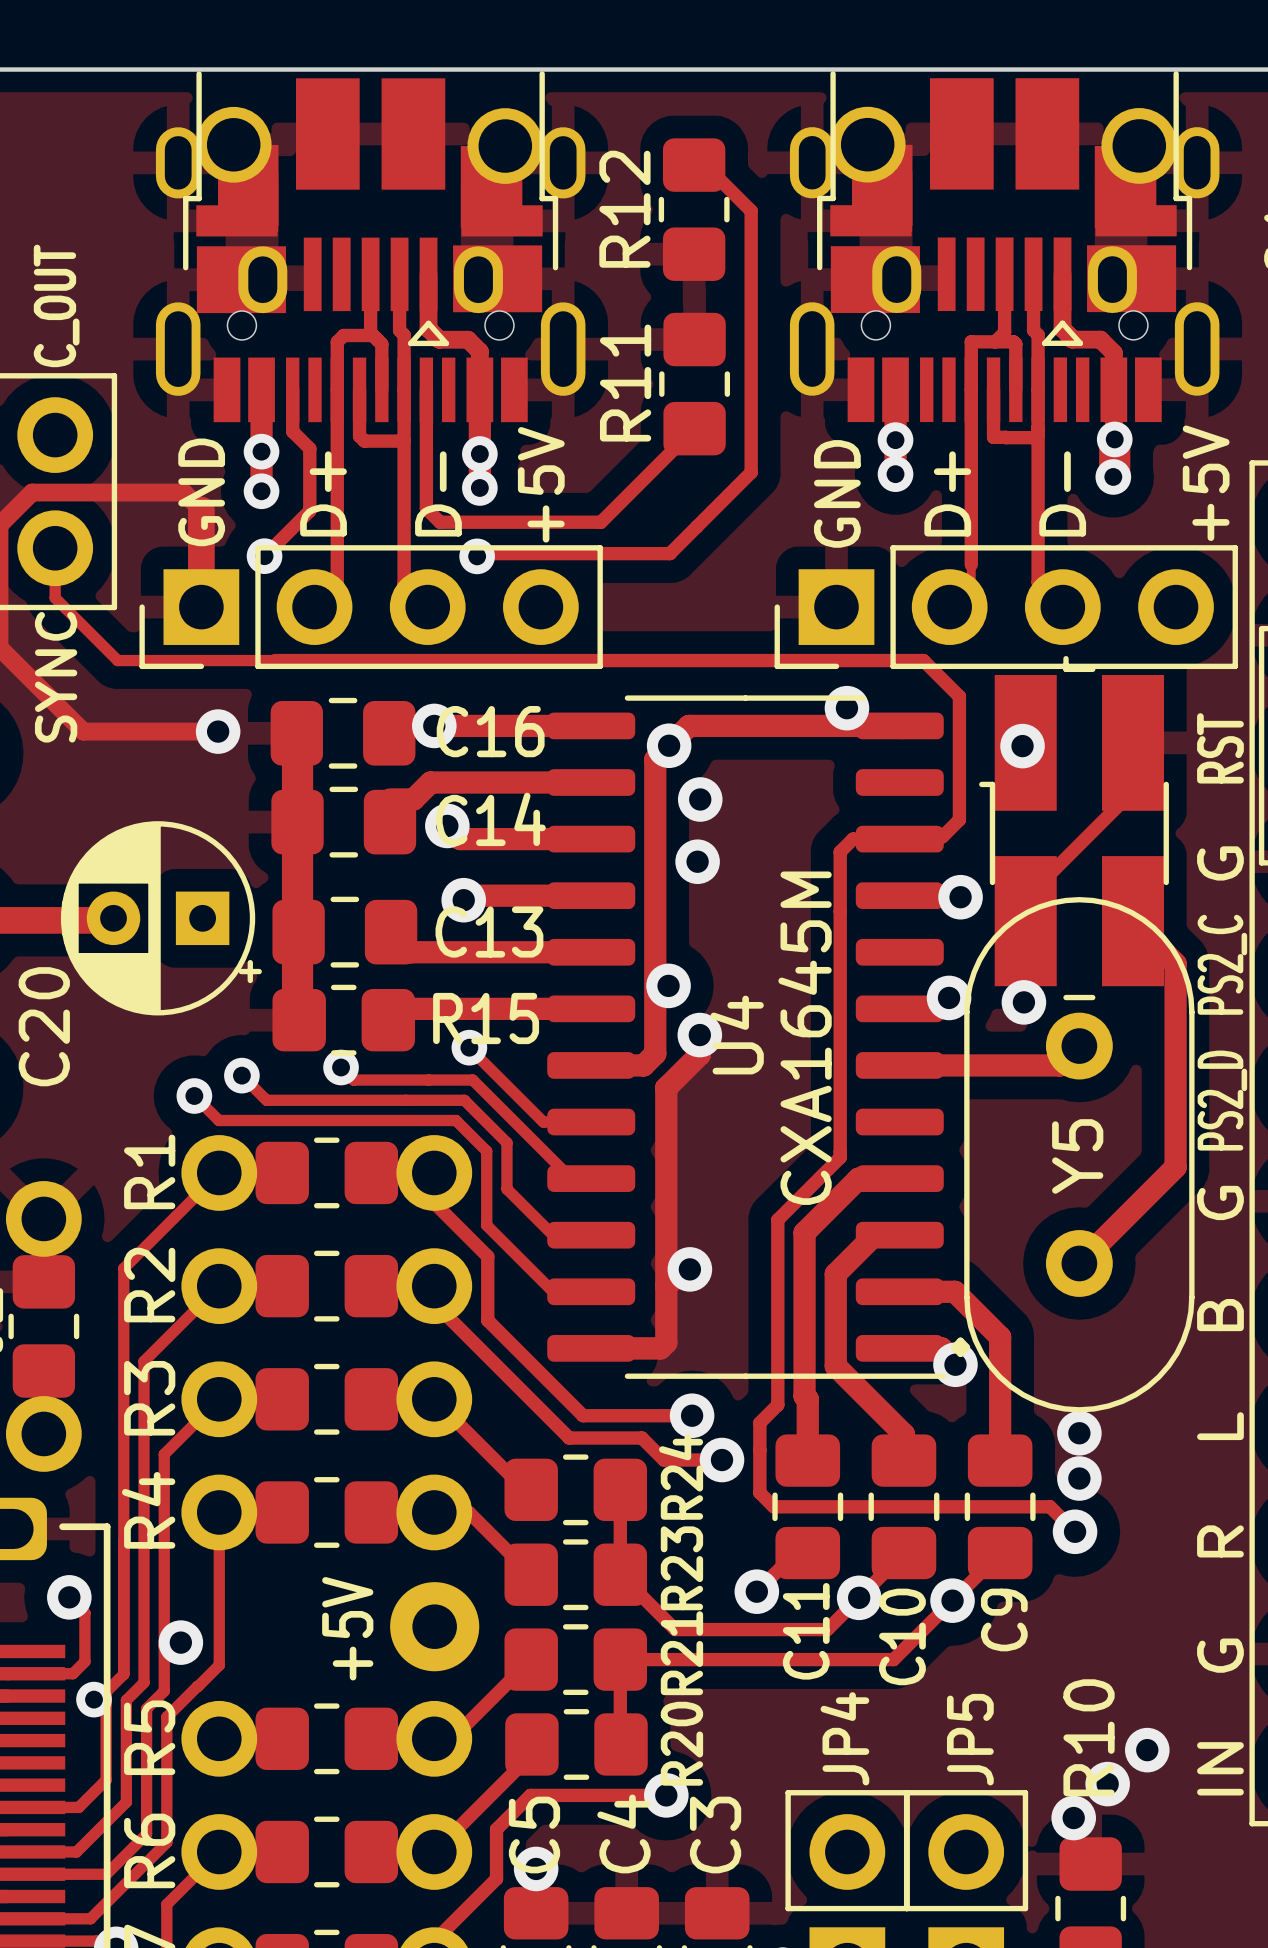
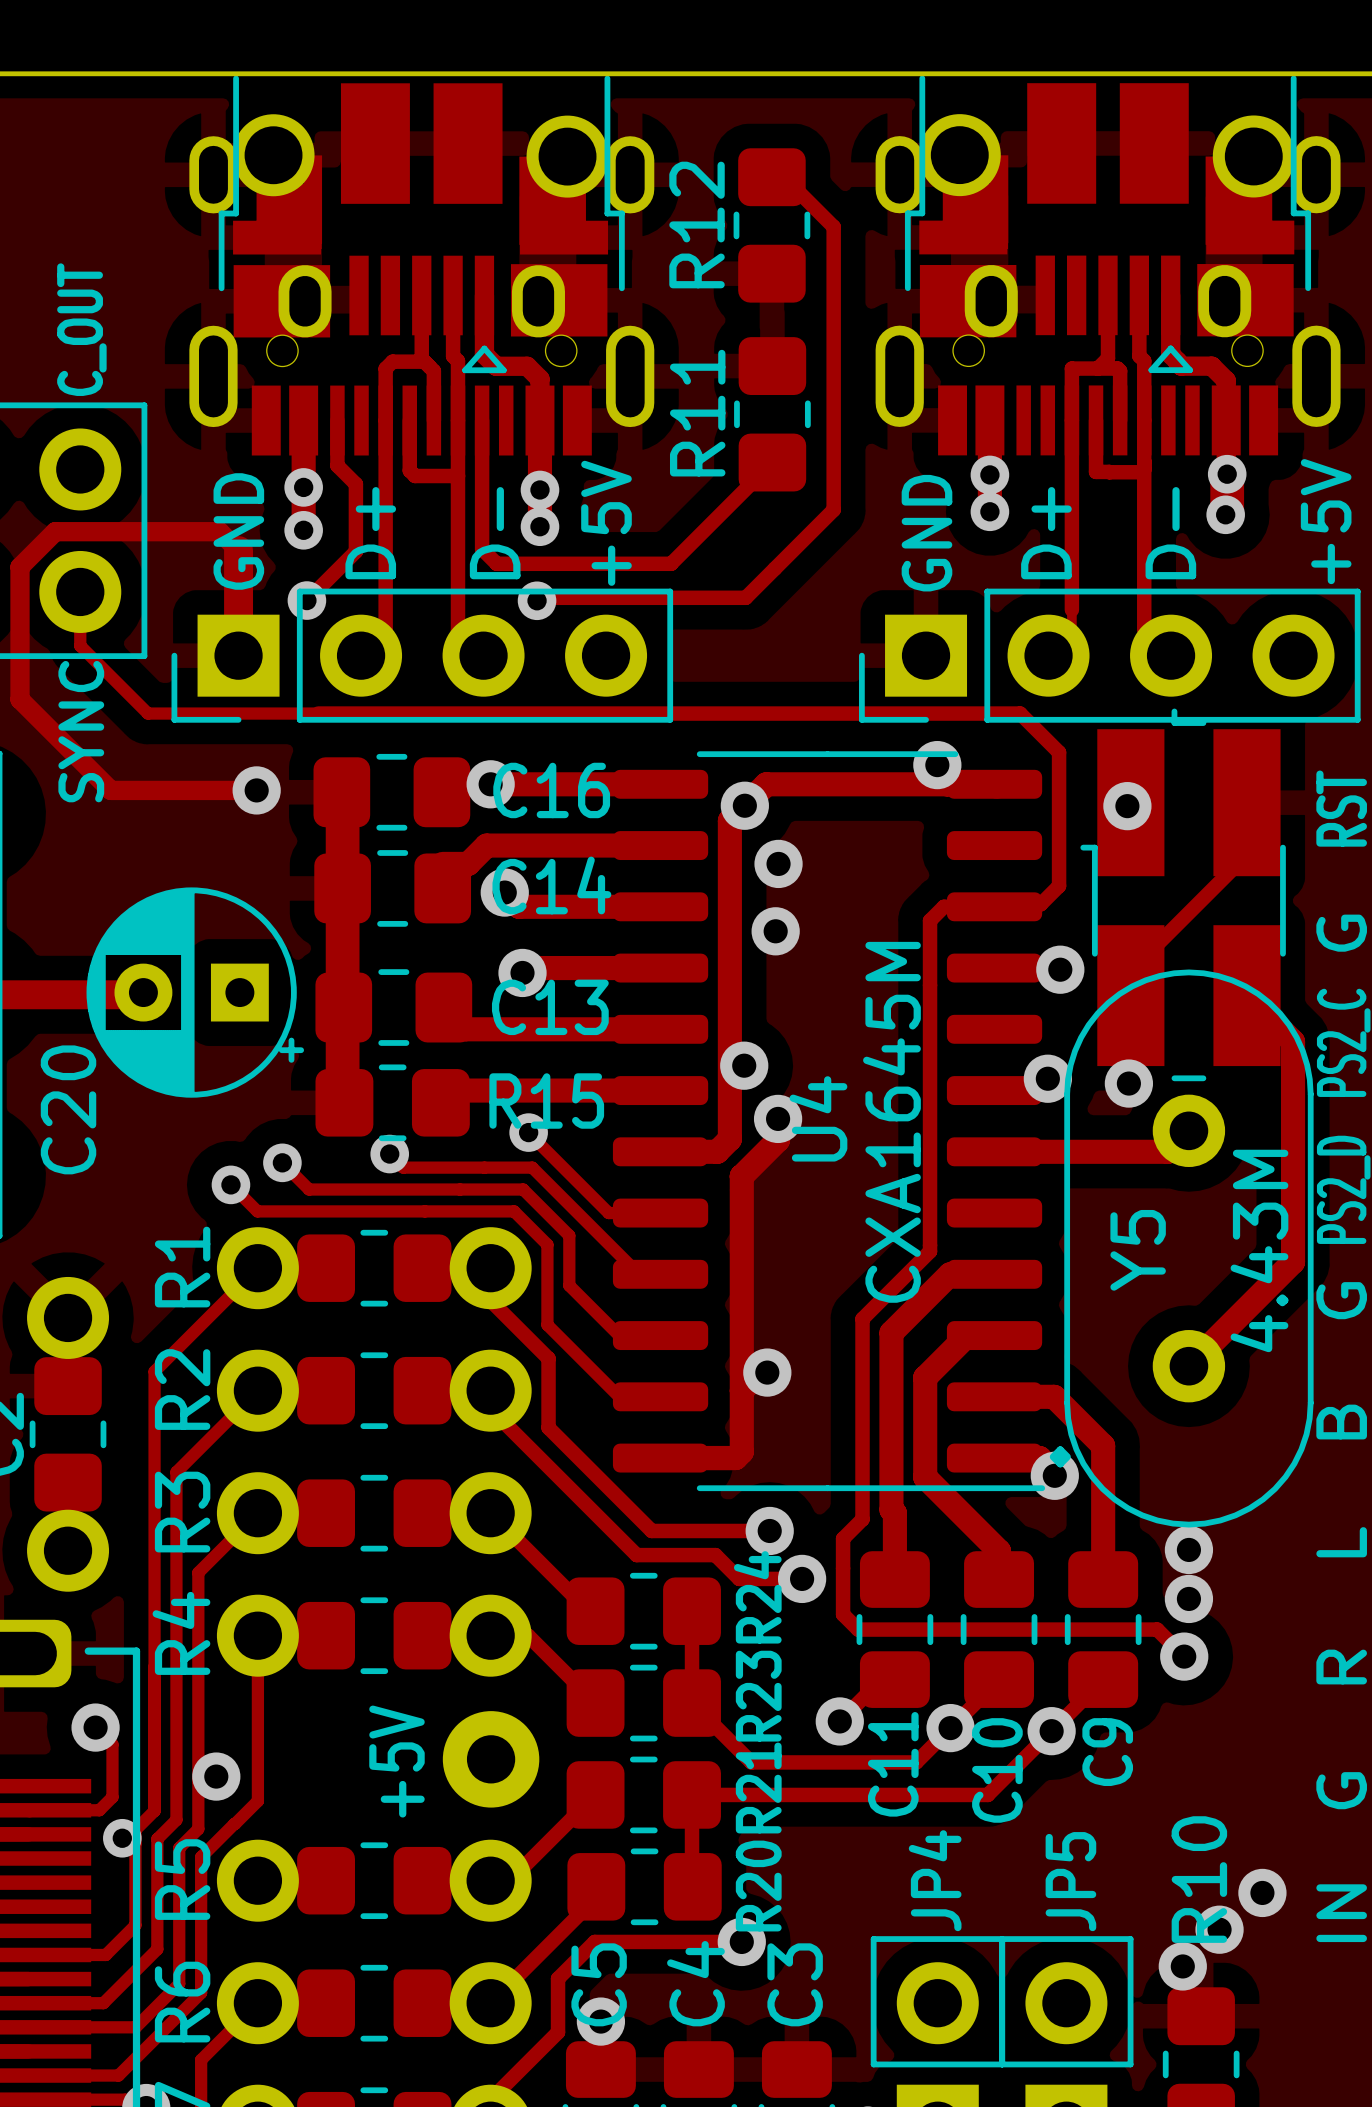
Y5 name position: Y5 (1077, 1156) -> Y5 (1138, 1250)
text: none -> 4.43M (1259, 1250)

